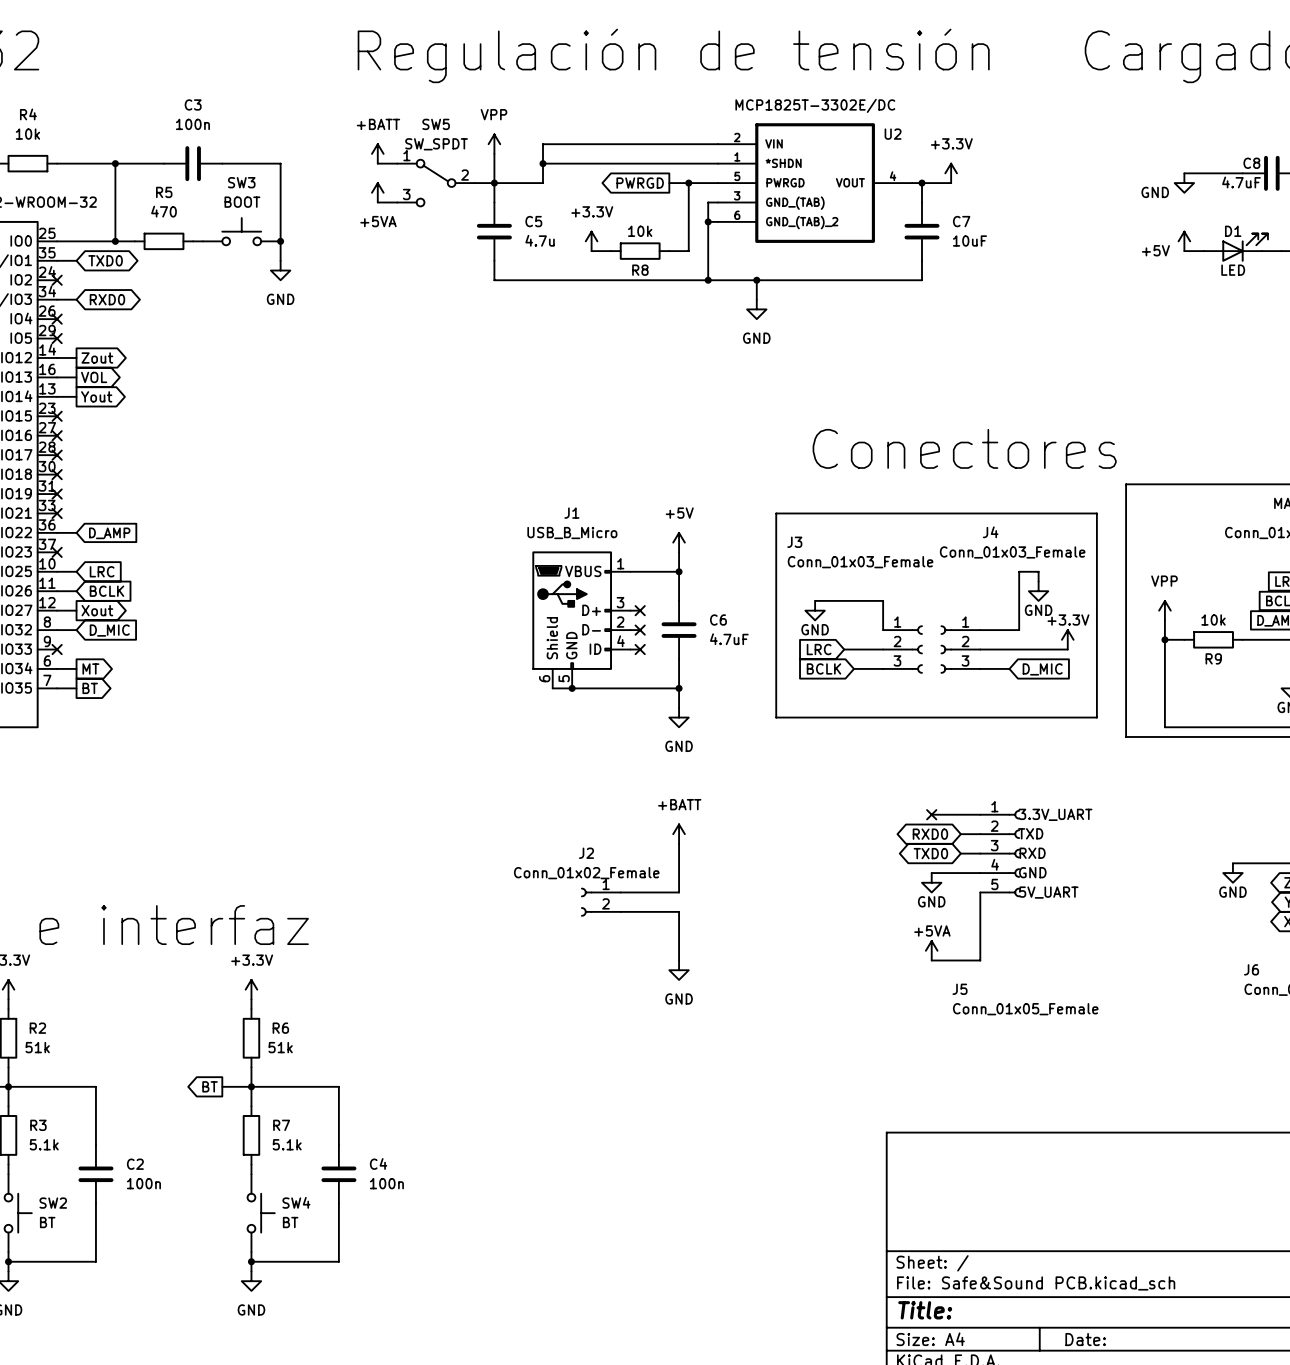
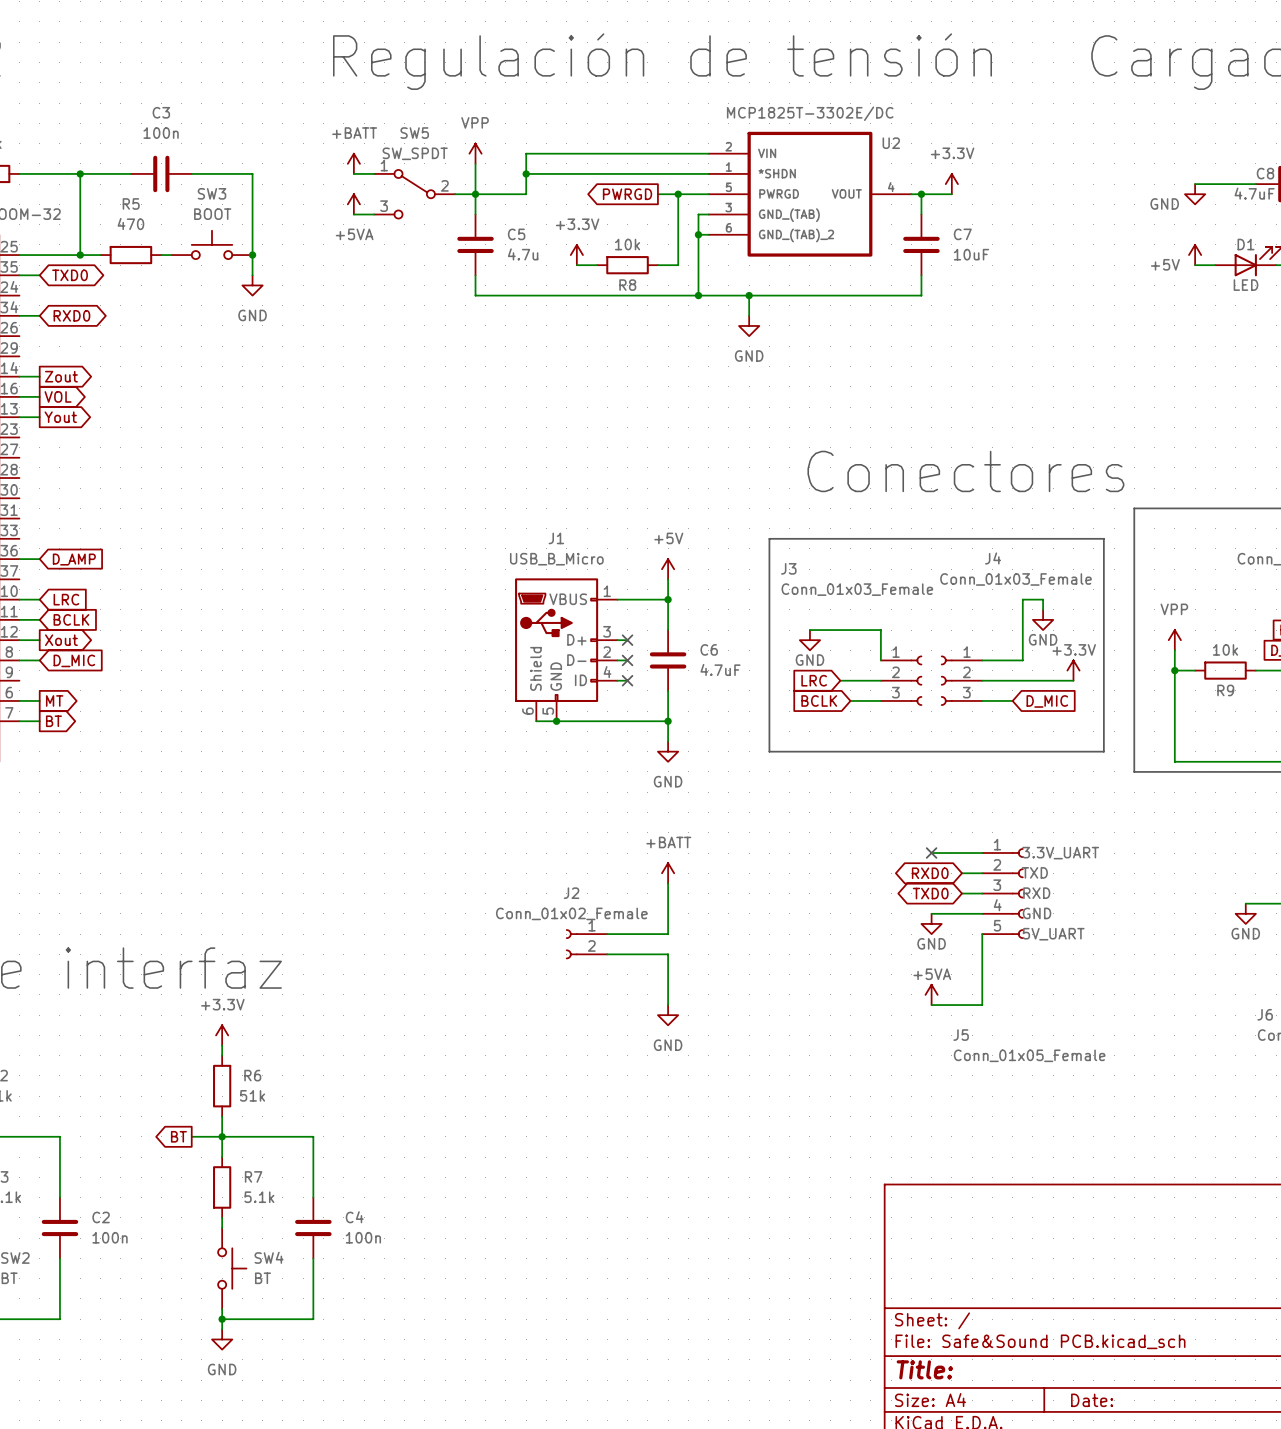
no-connect mark: (57, 280) -> none
no-connect mark: (57, 319) -> none
no-connect mark: (57, 338) -> none
no-connect mark: (57, 416) -> none
no-connect mark: (57, 435) -> none
no-connect mark: (57, 455) -> none
no-connect mark: (57, 474) -> none
no-connect mark: (57, 494) -> none
no-connect mark: (57, 513) -> none
no-connect mark: (57, 552) -> none
no-connect mark: (57, 649) -> none

